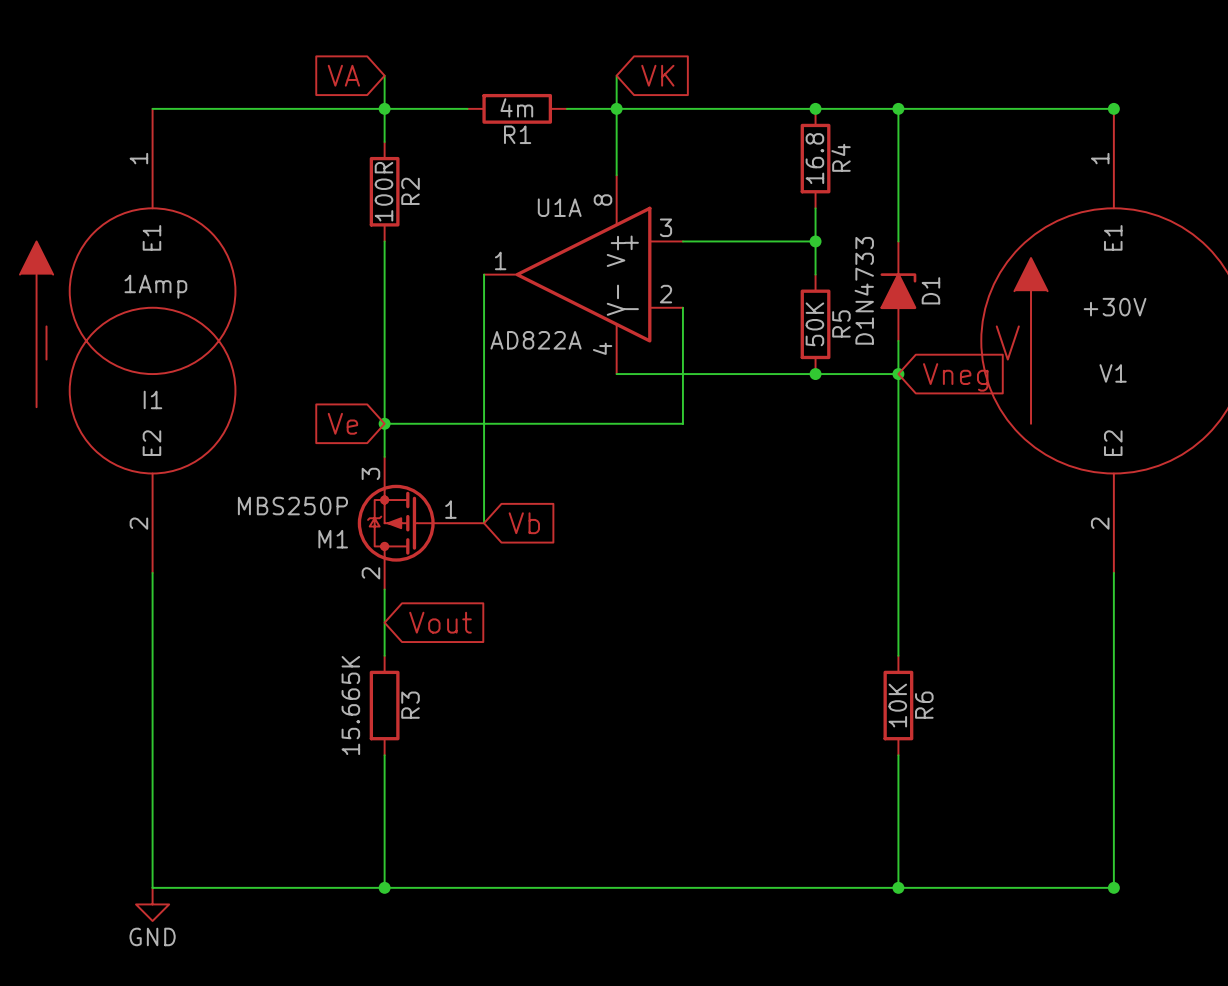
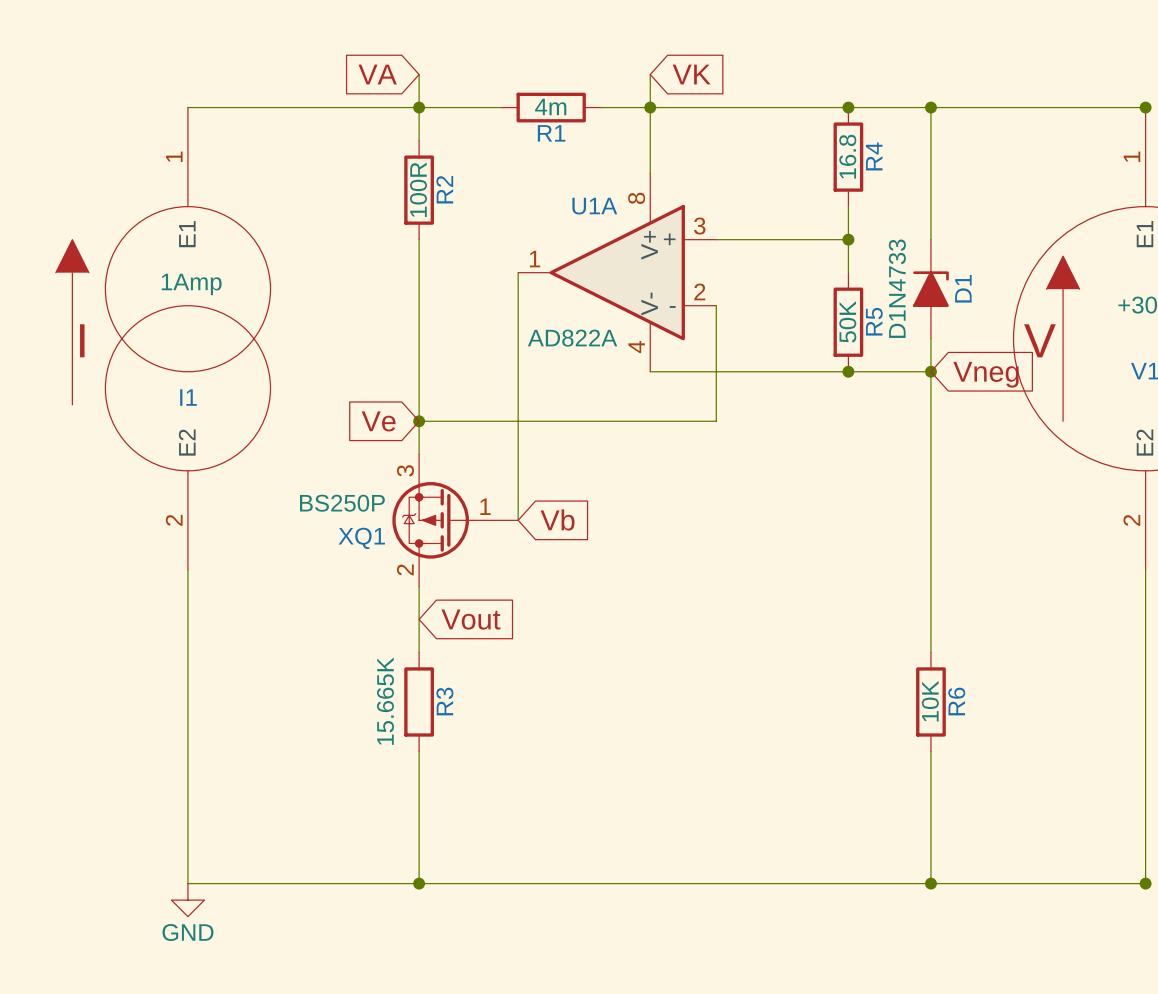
M1 value: MBS250P (292, 506) -> BS250P (342, 503)
M1 name: M1 (333, 539) -> XQ1 (361, 538)

